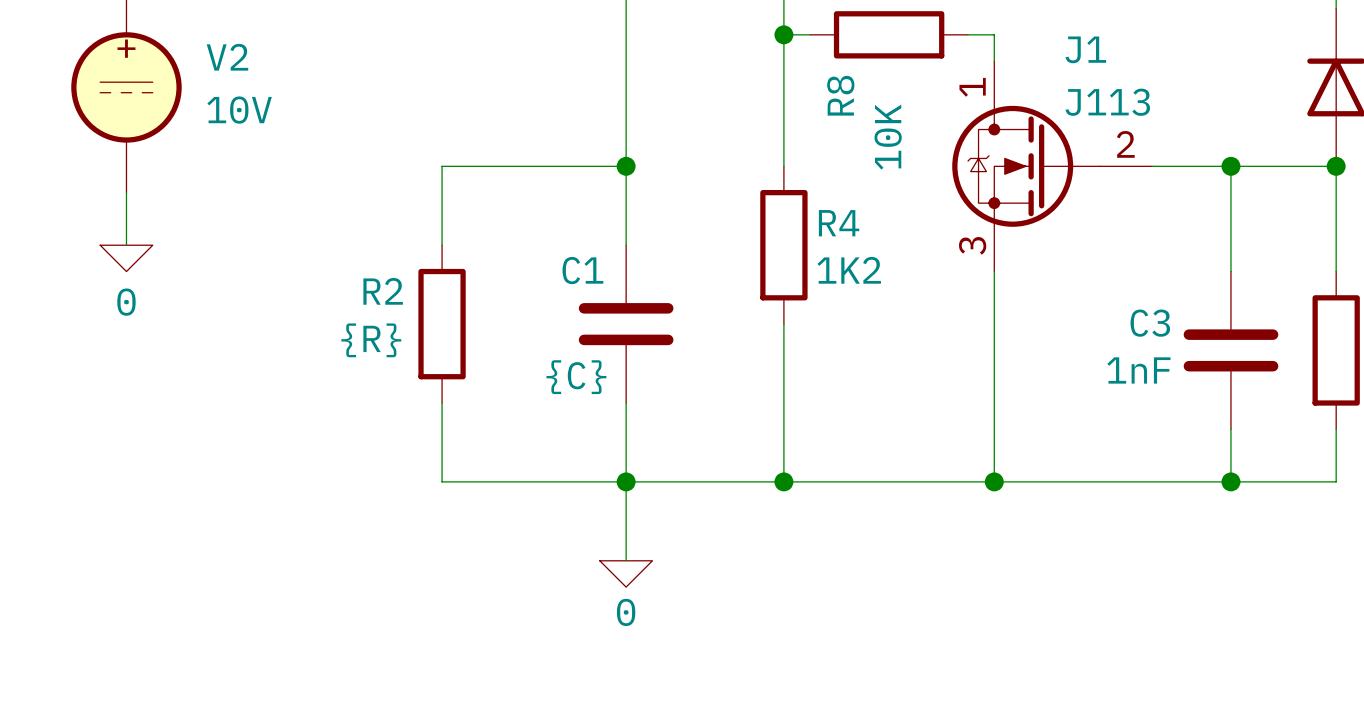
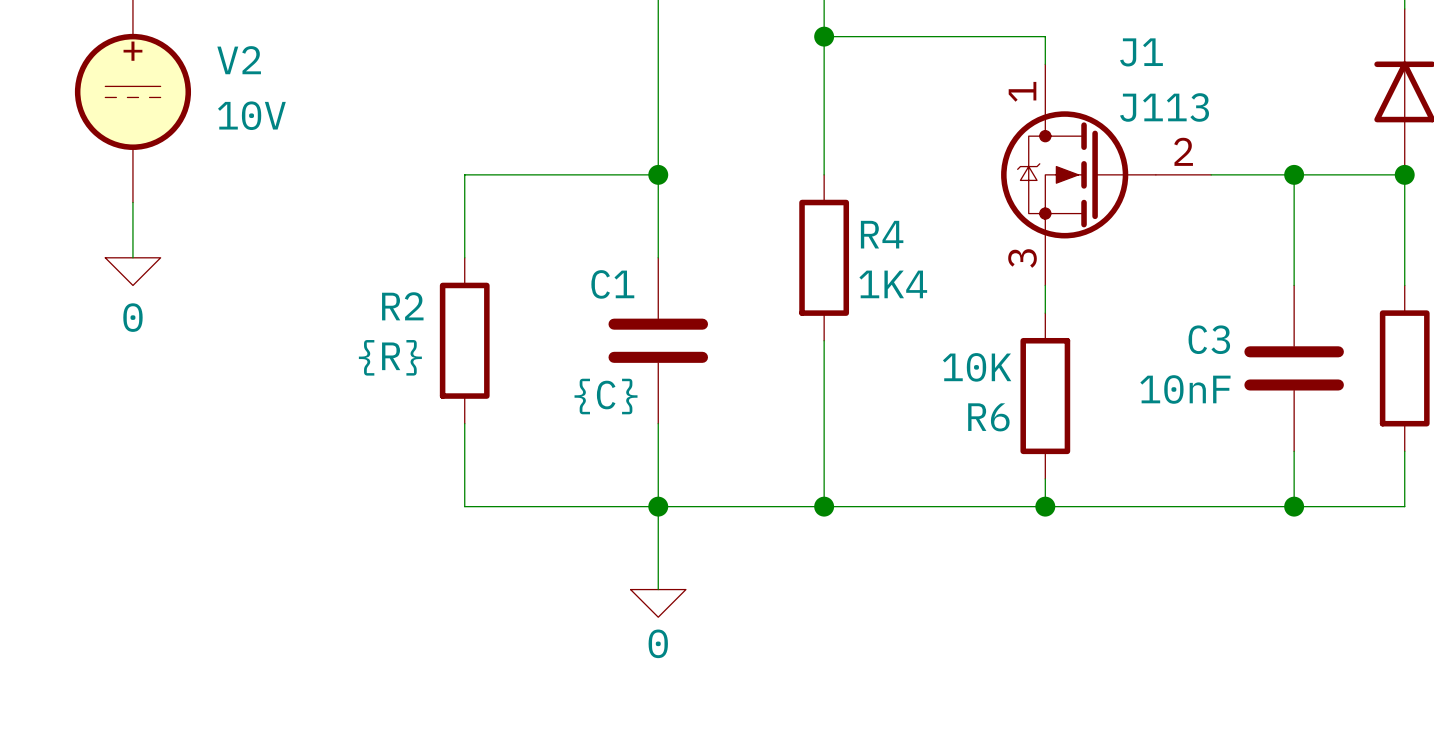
wire: none -> (851, 36) (1017, 36)
R8: 10K (889, 34) -> none
R4 value: 1K2 (849, 270) -> 1K4 (893, 284)
wire: (994, 297) (994, 455) -> none
C3 value: 1nF (1138, 370) -> 10nF (1185, 389)
R6: none -> 10K (1045, 396)

